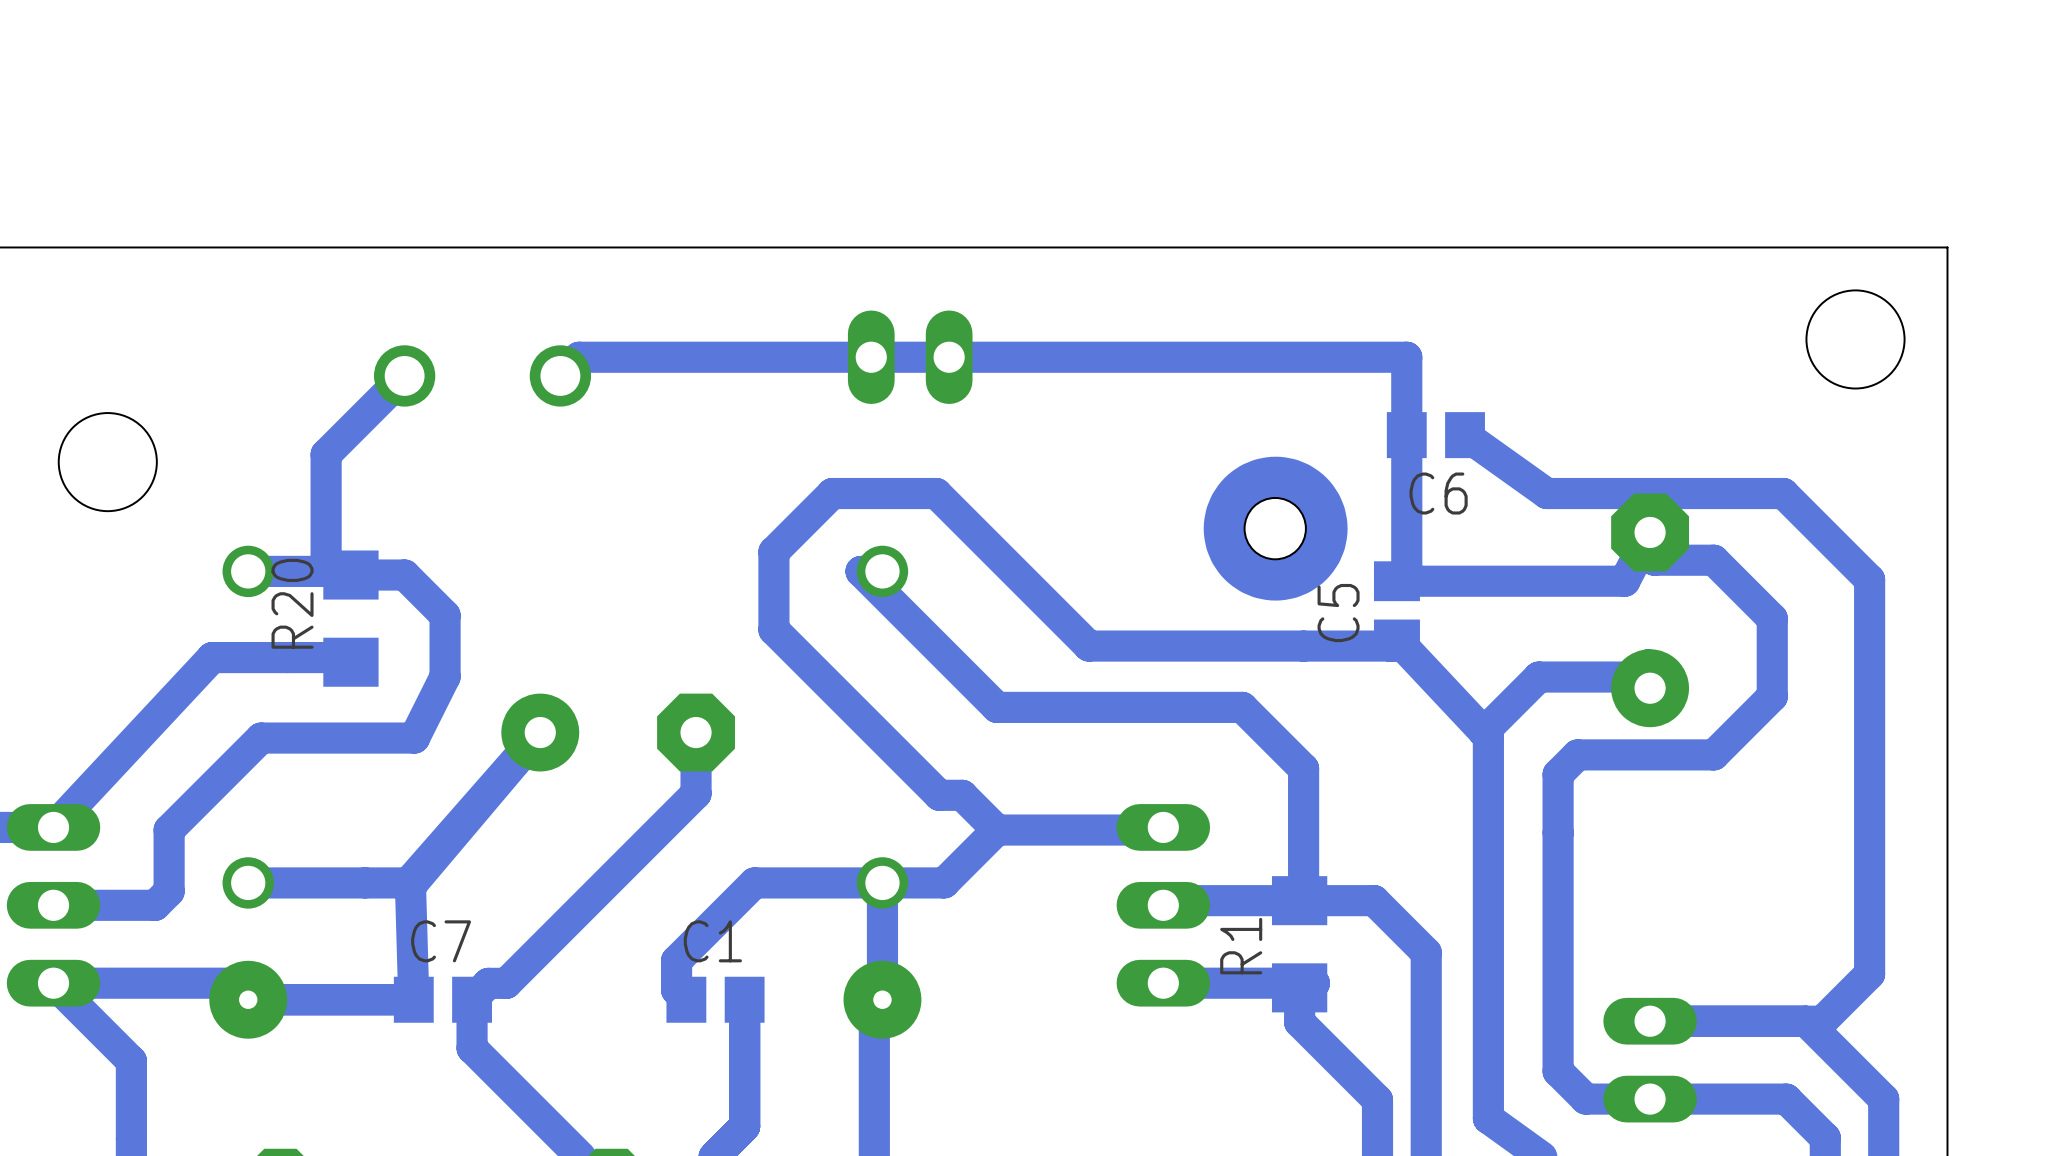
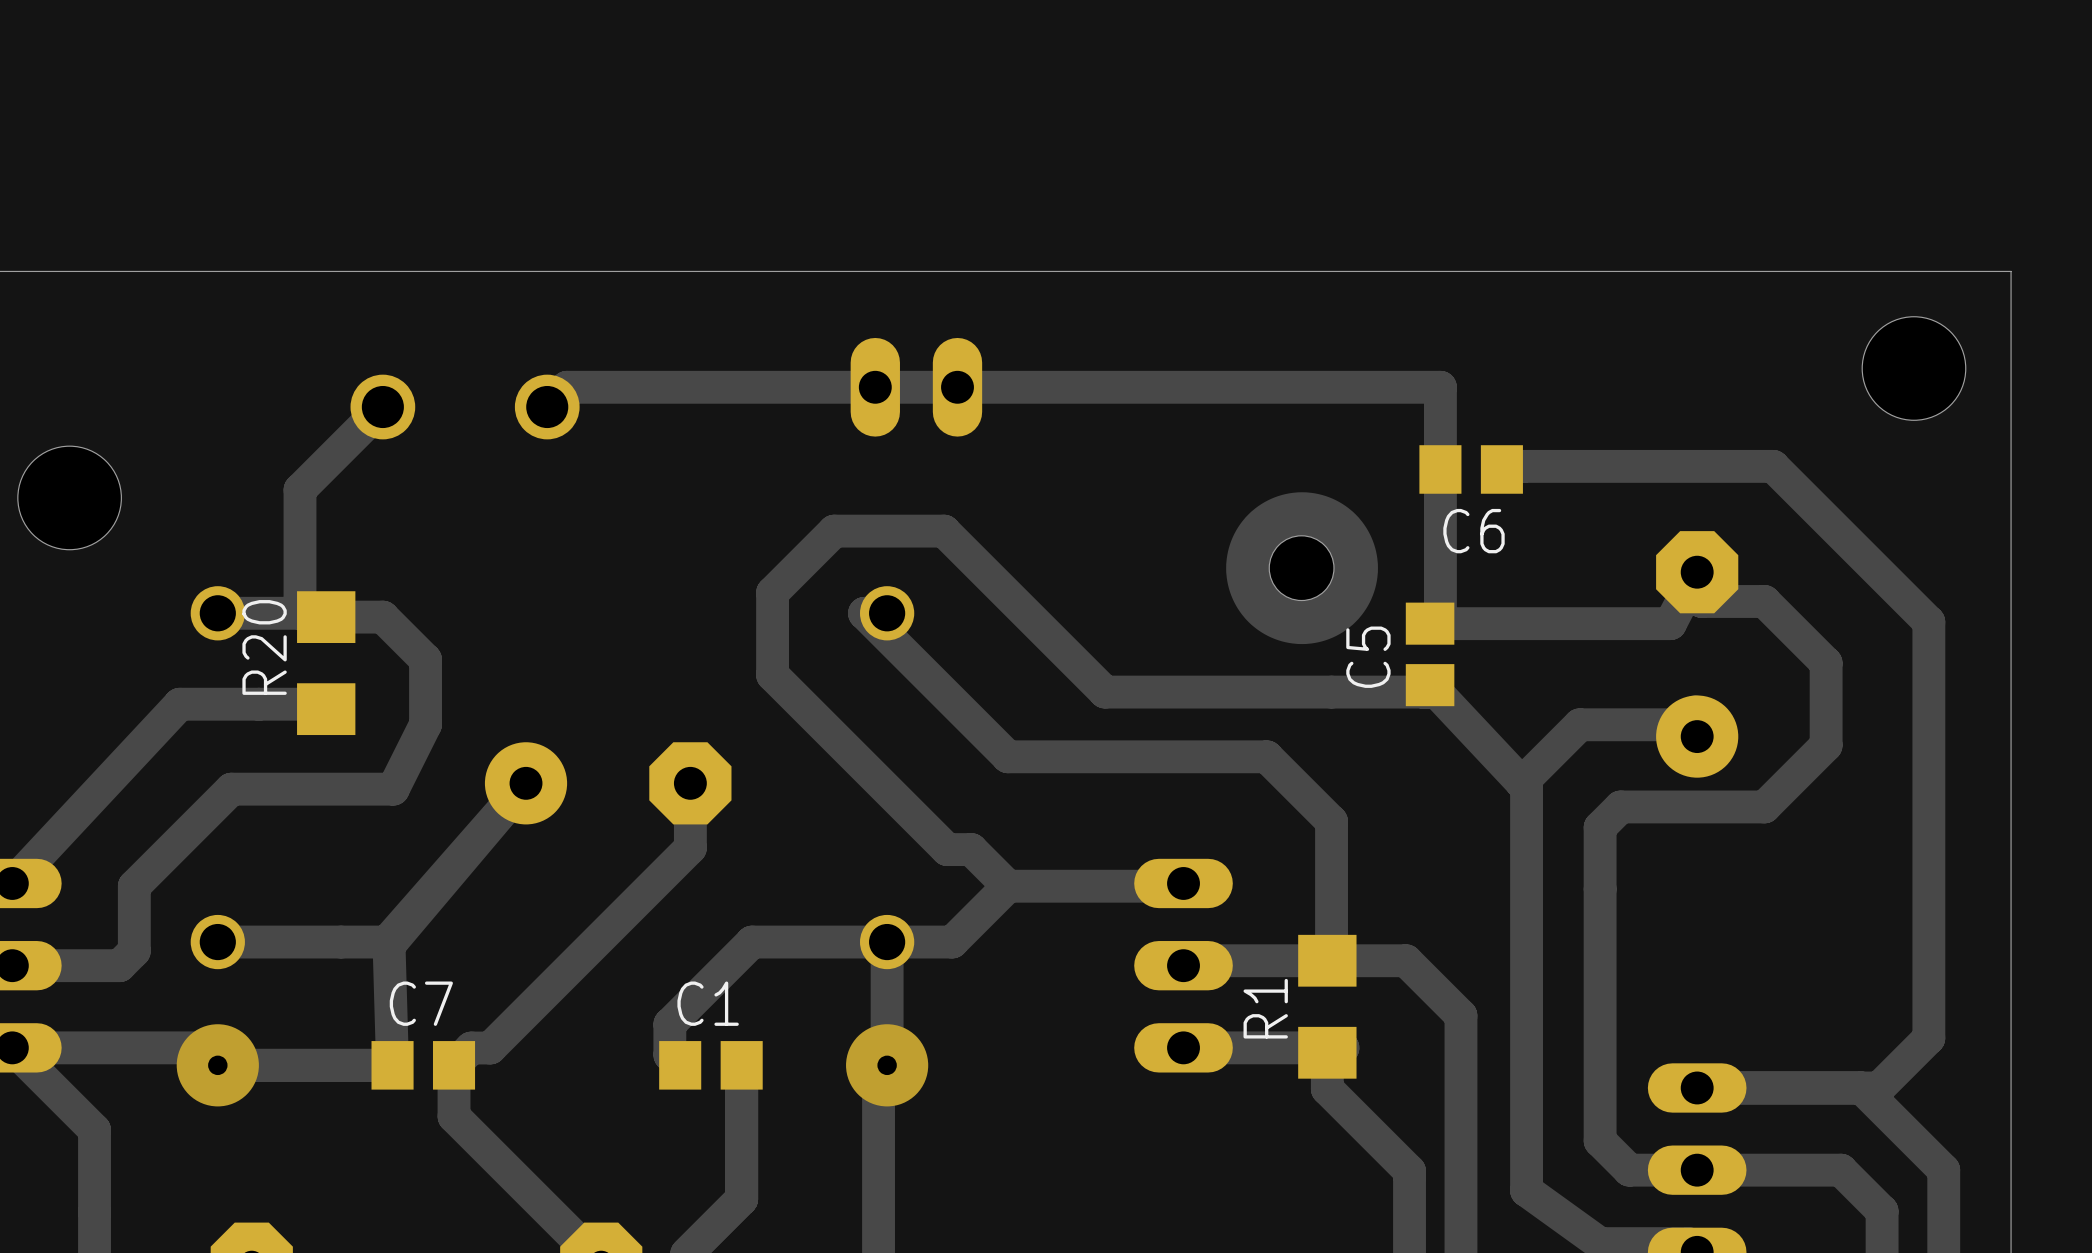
track: (1465, 435) (1546, 493) (1783, 493) -> (1501, 469) (1523, 466) (1773, 466) (1837, 531)

